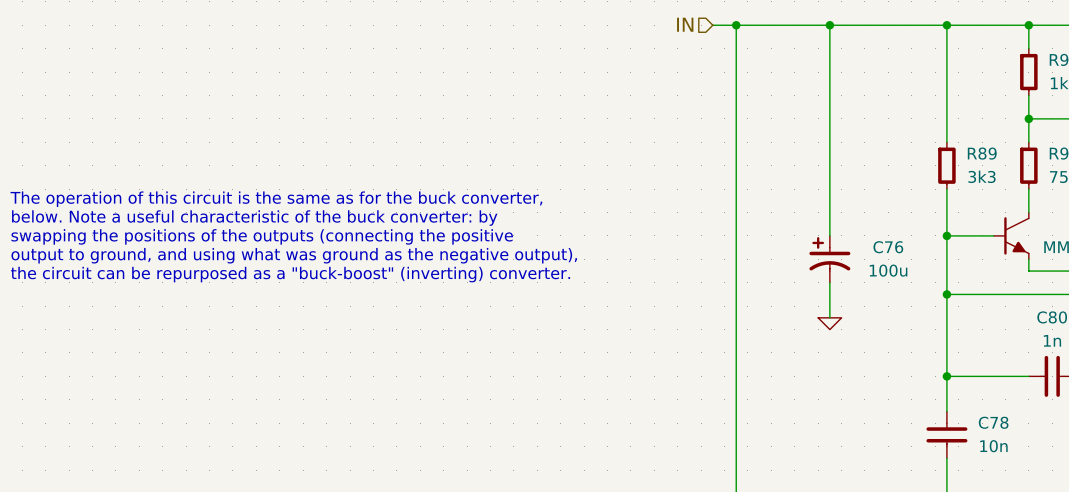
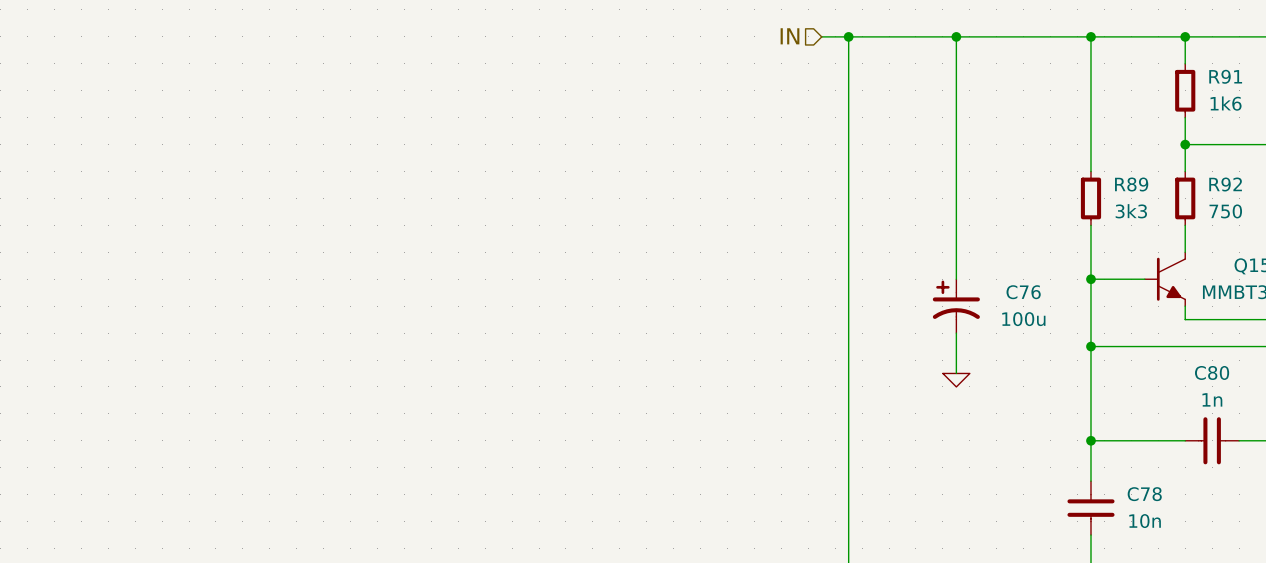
text: The operation of this circuit is the same as for the buck converter, (276, 199) -> none
text: below. Note a useful characteristic of the buck converter: by (254, 218) -> none
text: swapping the positions of the outputs (connecting the positive (262, 236) -> none
text: output to ground, and using what was ground as the negative output), (294, 255) -> none
text: the circuit can be repurposed as a "buck-boost" (inverting) converter. (290, 274) -> none

